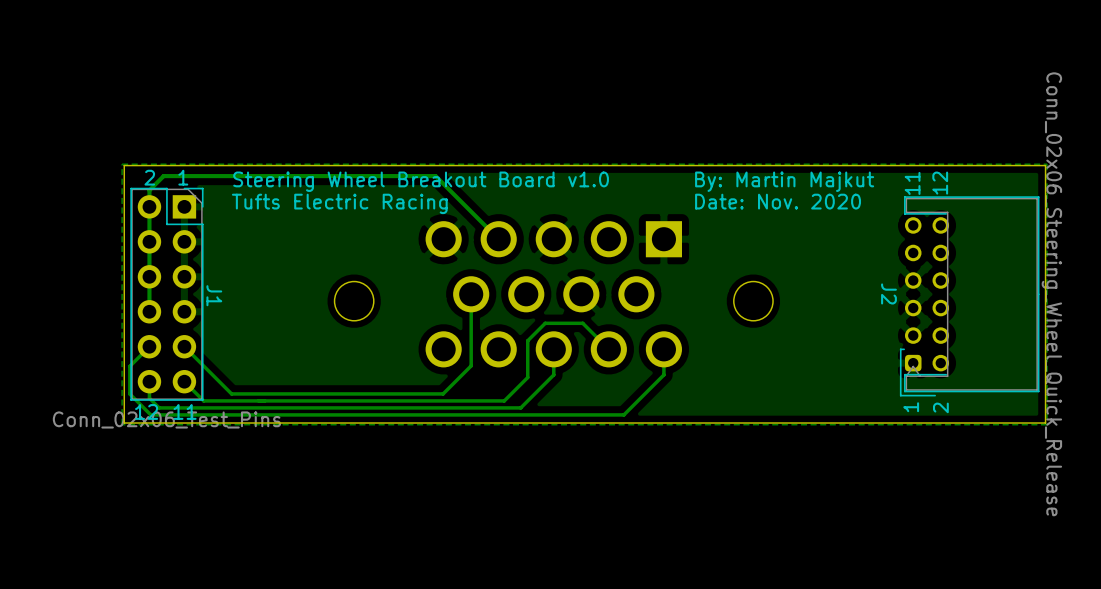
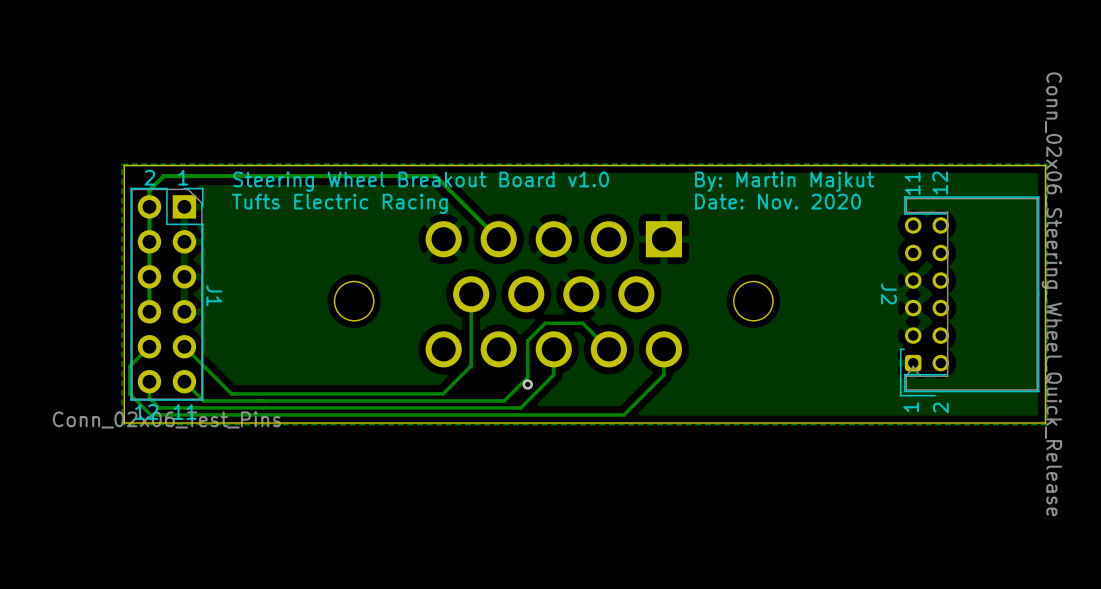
via: none -> (527, 384)

